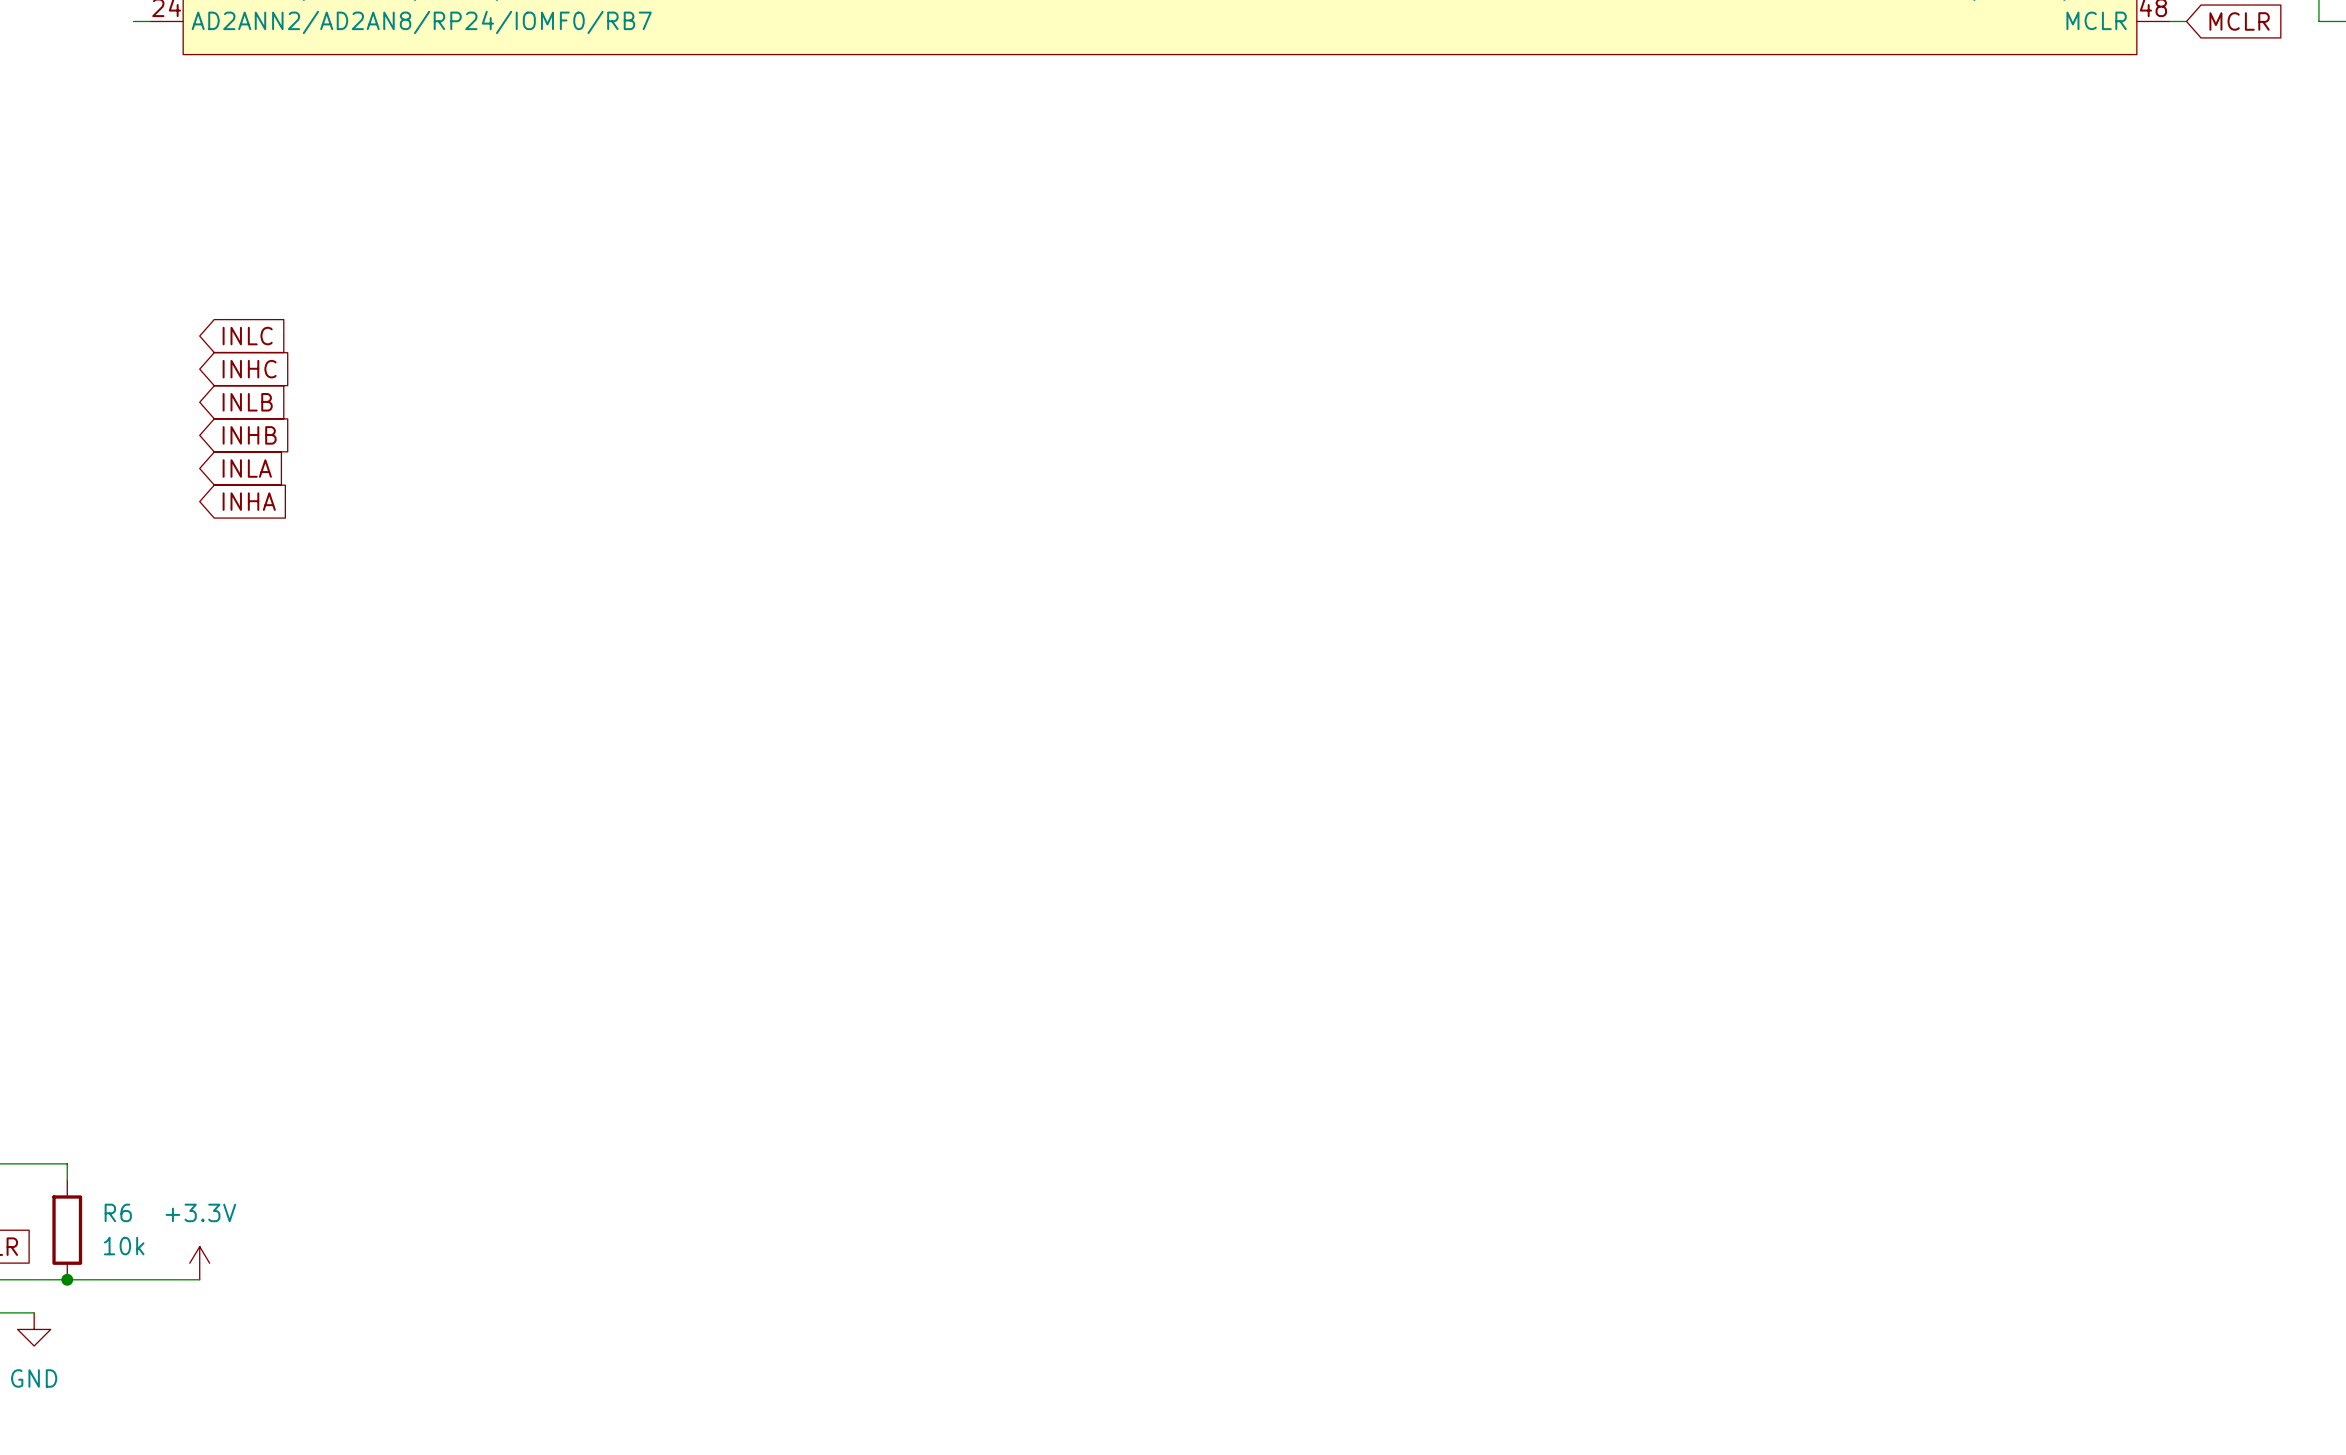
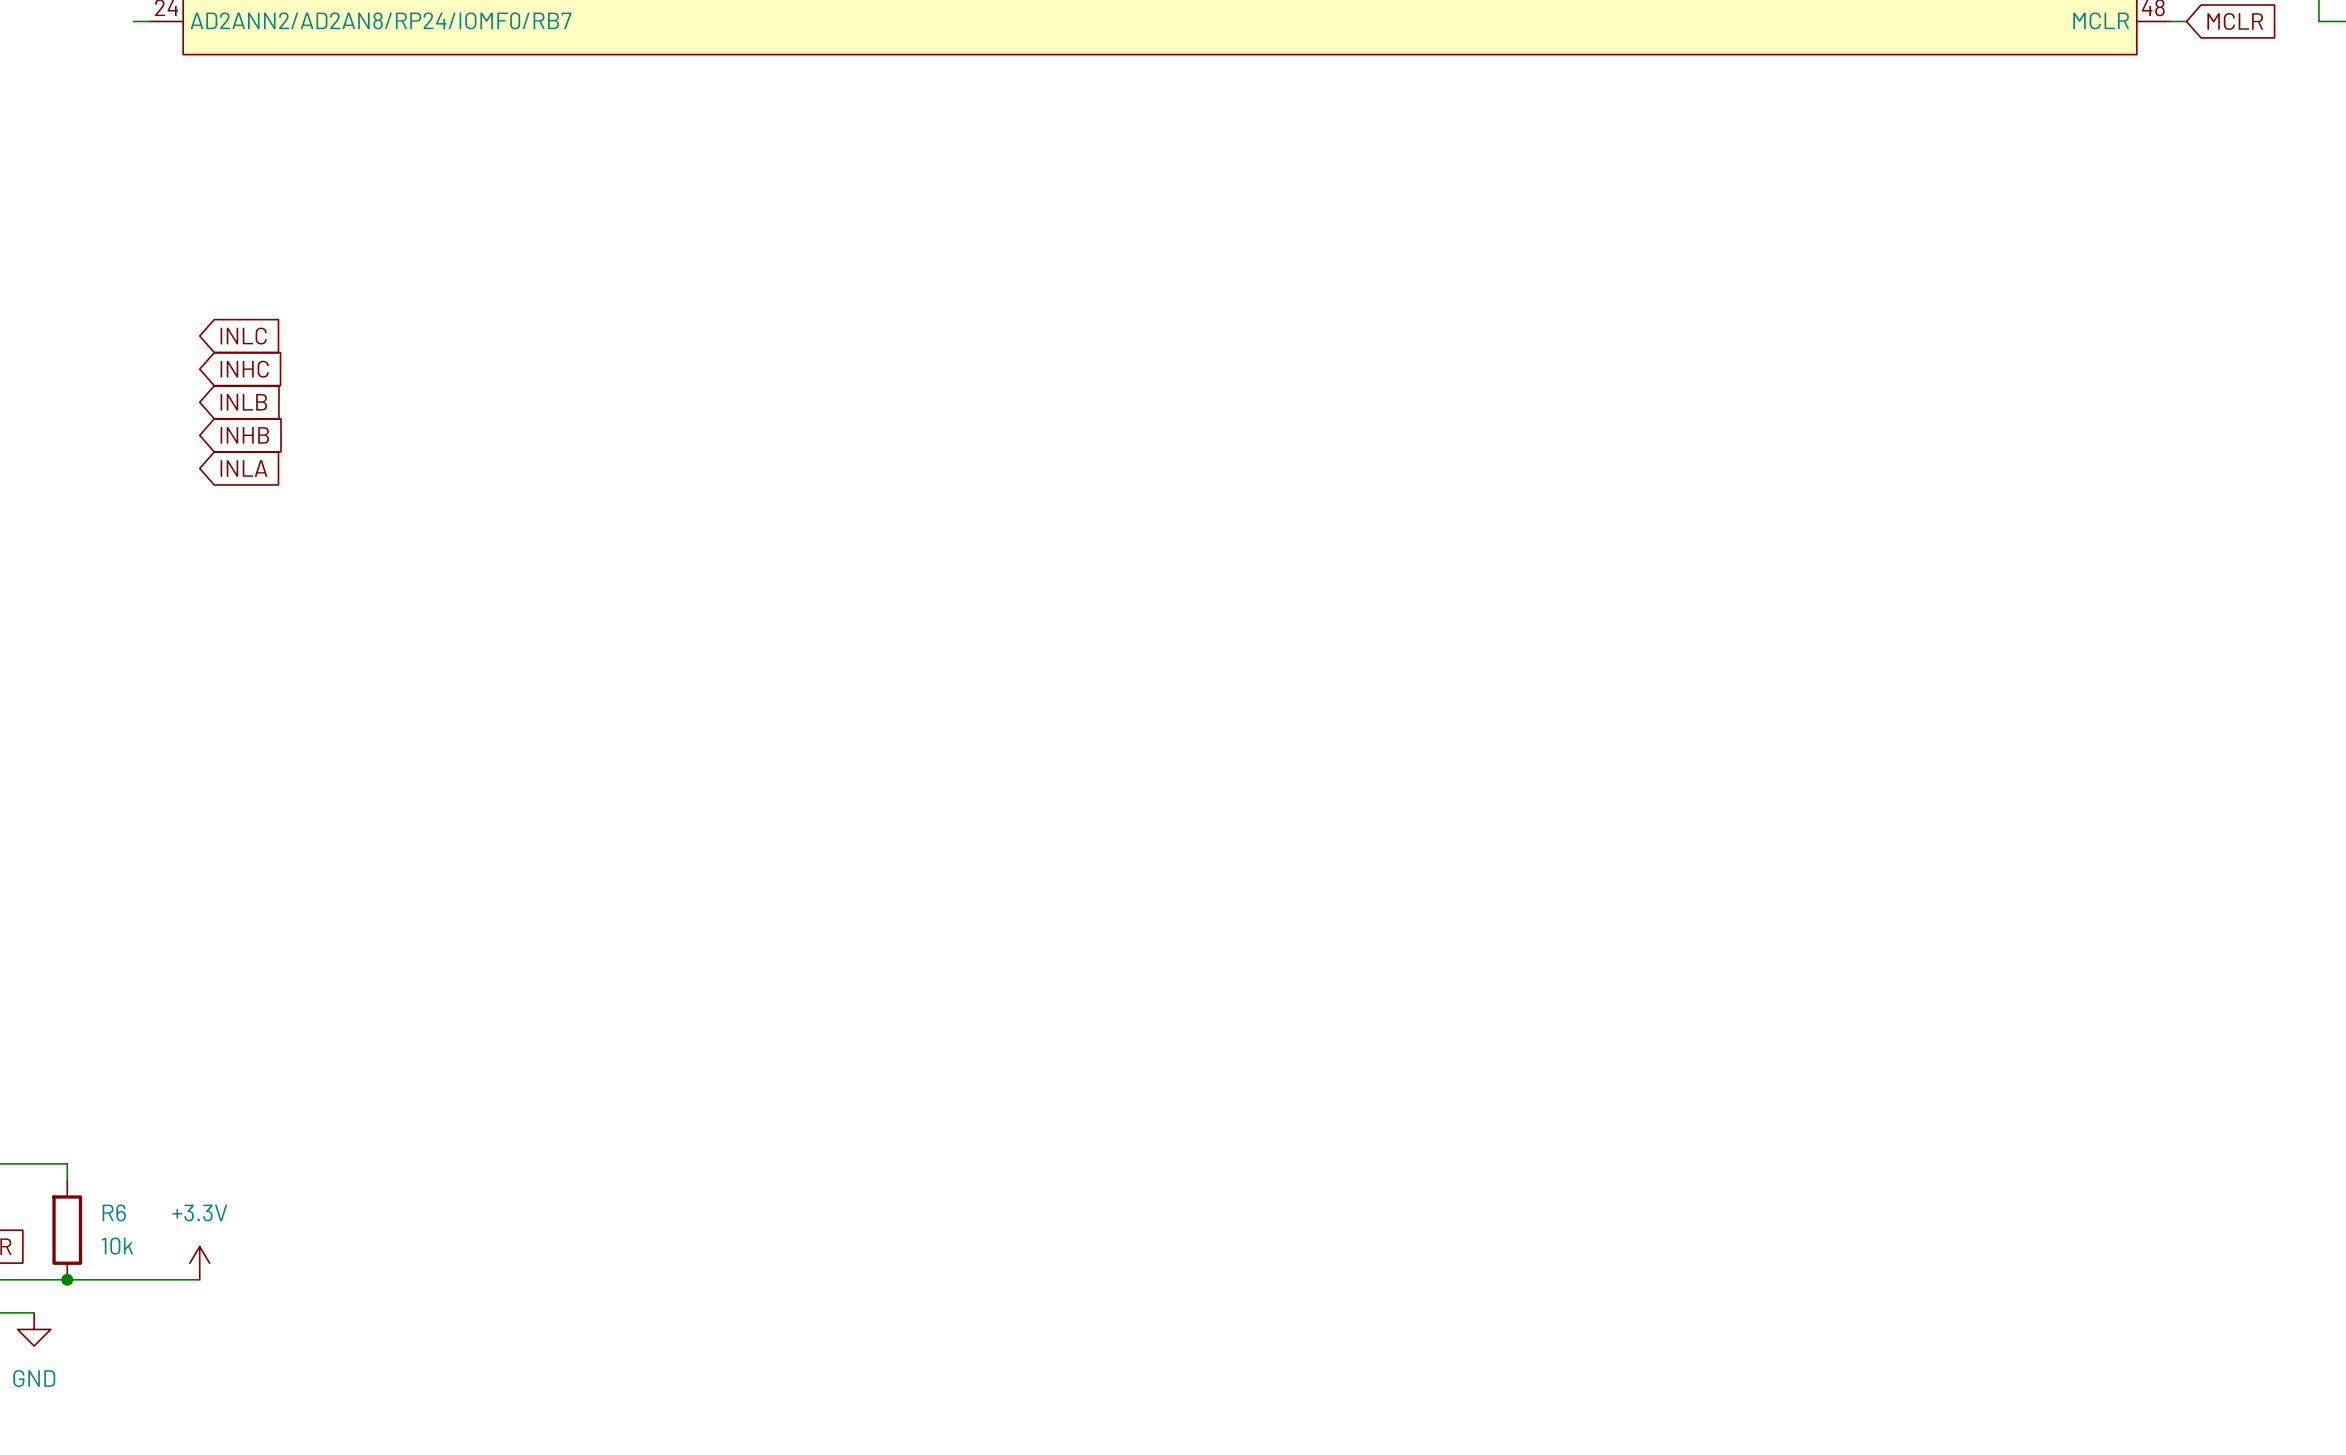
global label: INHA (249, 501) -> none

